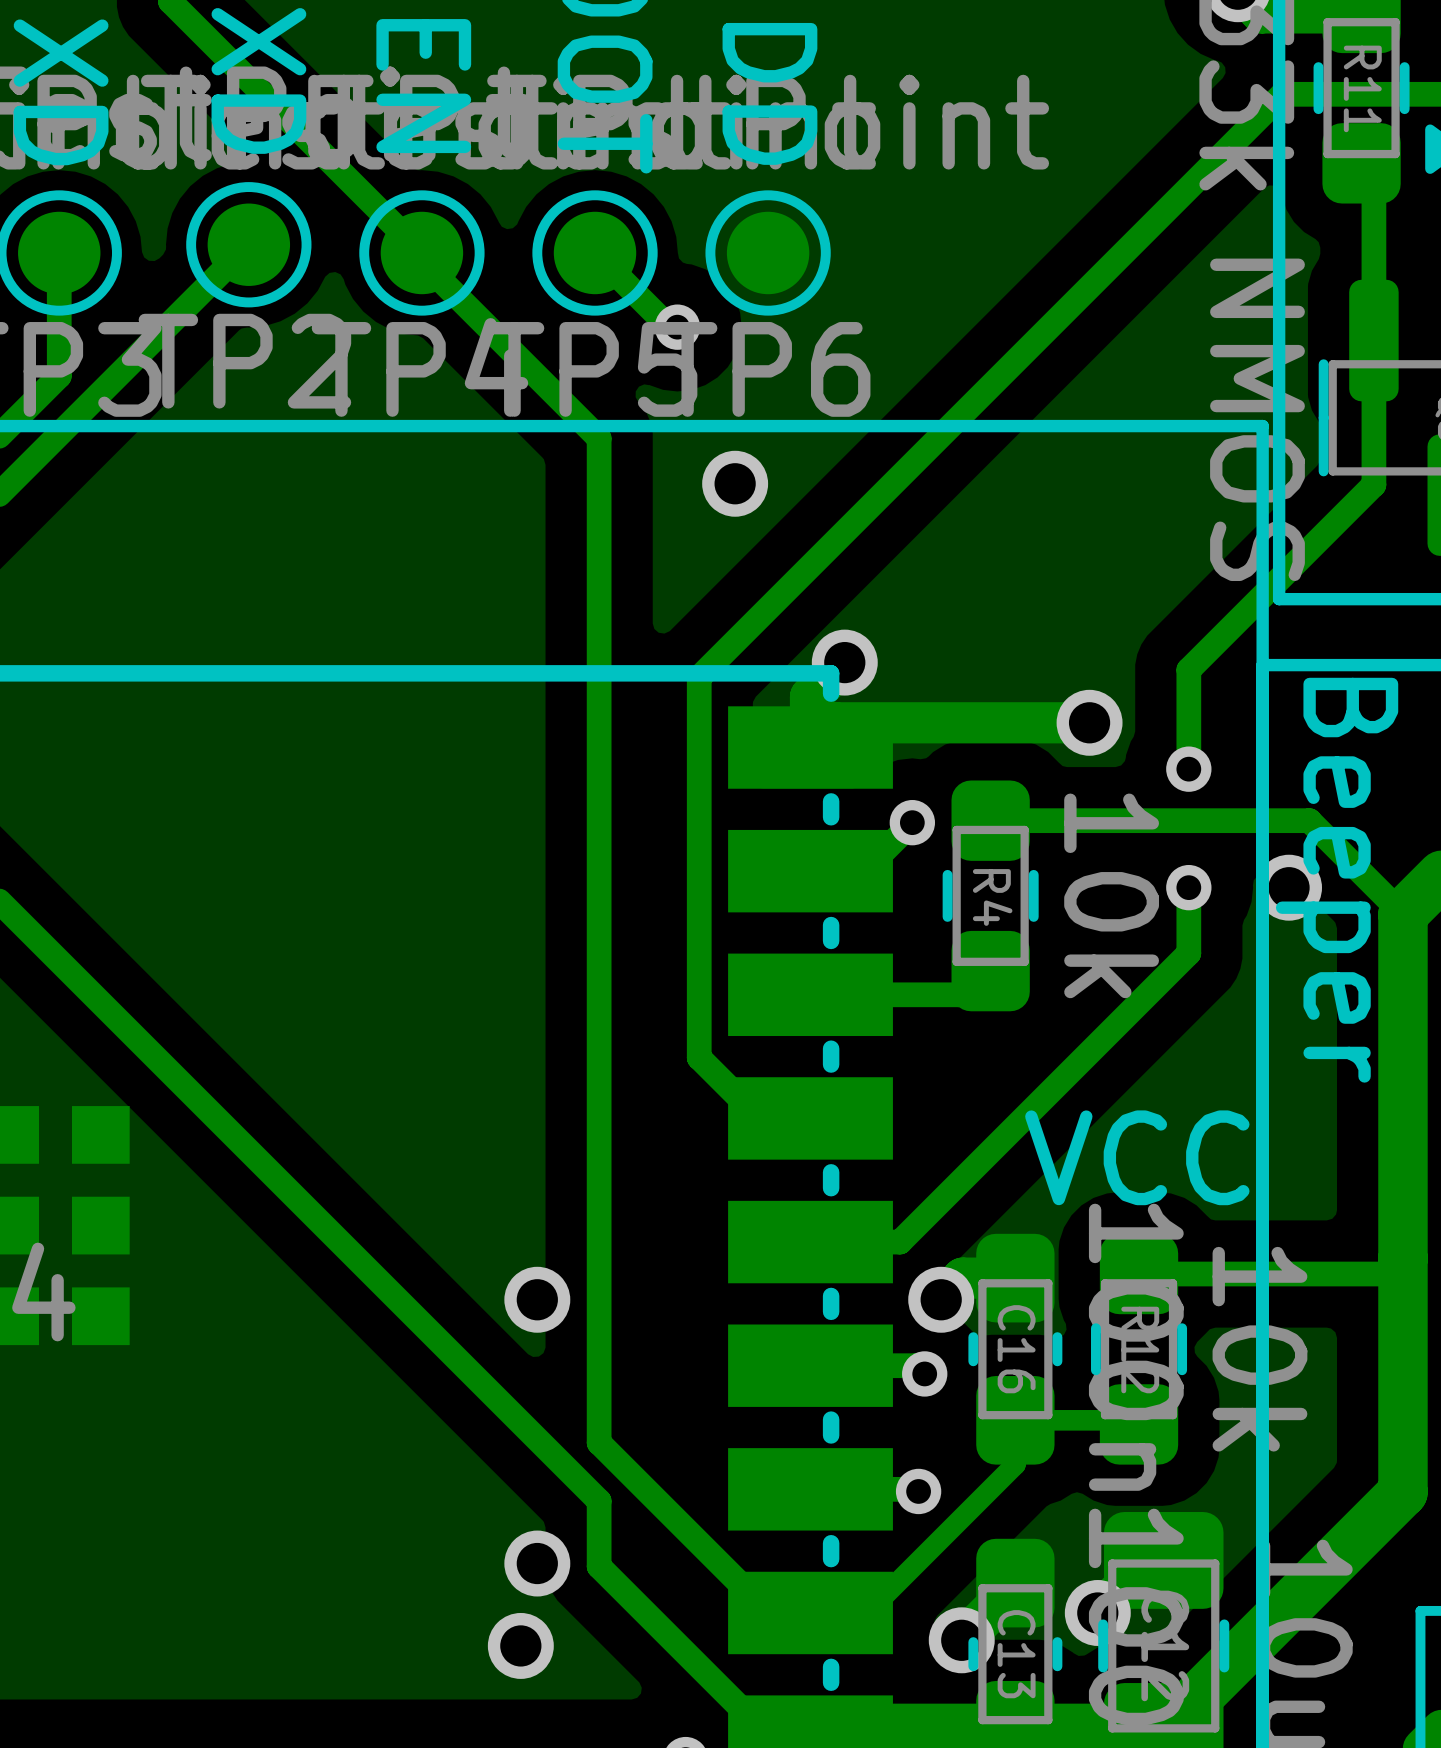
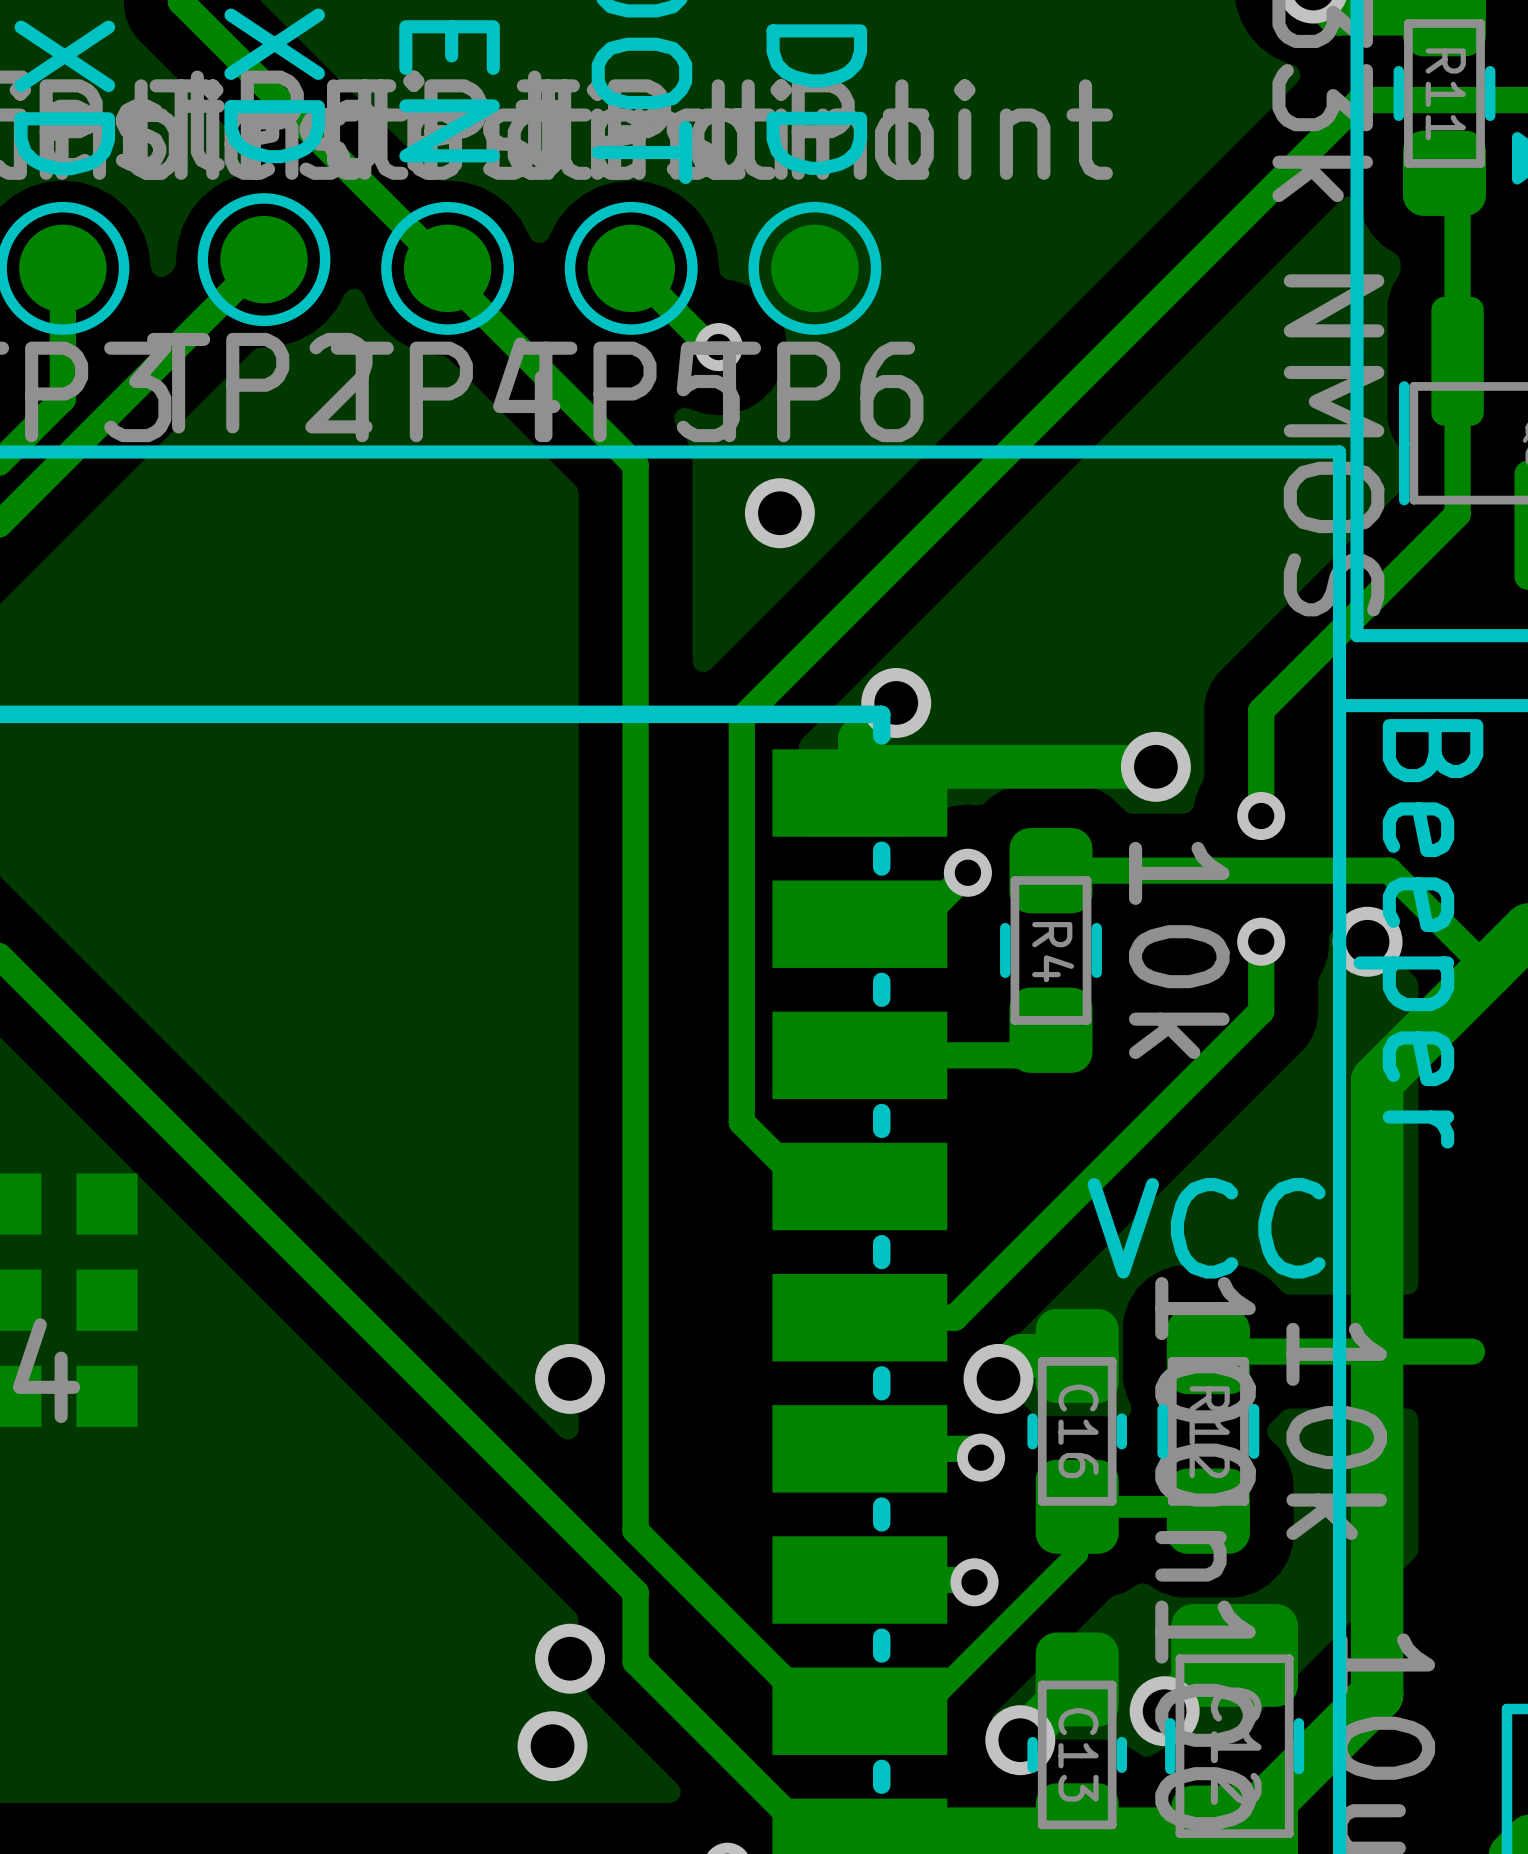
track: (1402, 914) (1402, 1492) (1298, 1597) -> (1488, 969) (1377, 1081) (1377, 1694)

